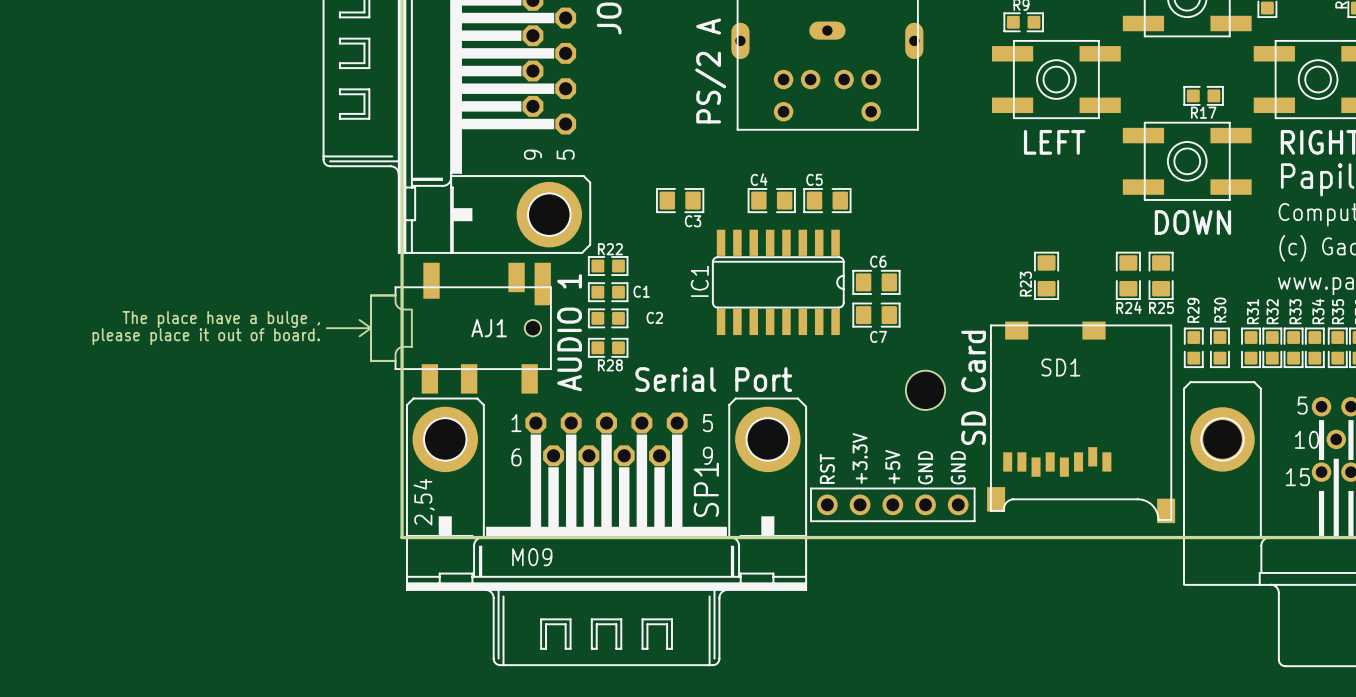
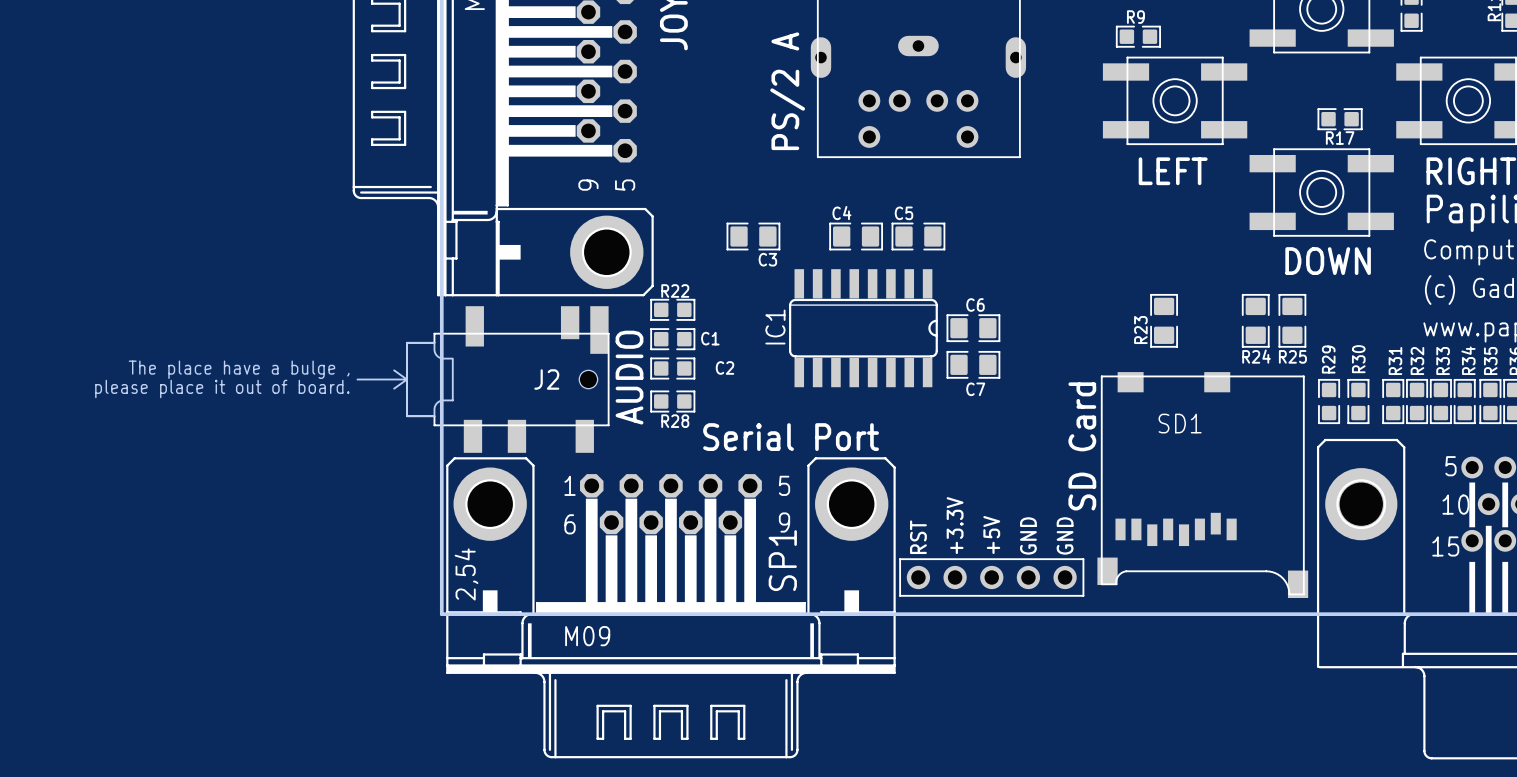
AJ1 name: AJ1 (489, 328) -> J2 (546, 379)
text: AUDIO 1 (569, 332) -> AUDIO (629, 377)
part: (925, 390) -> none

